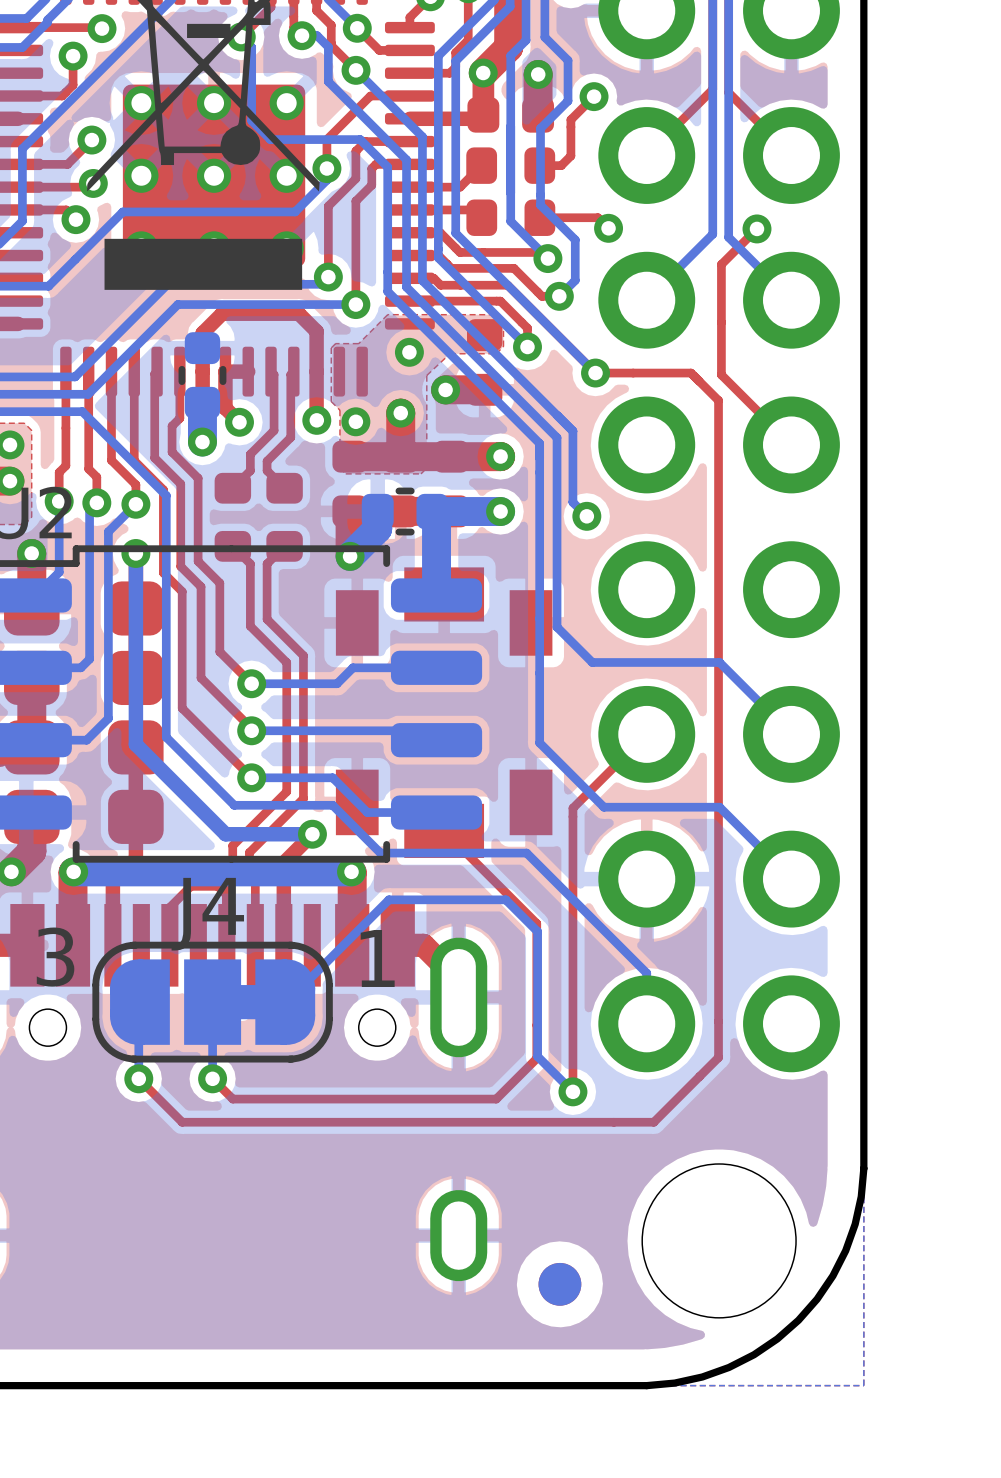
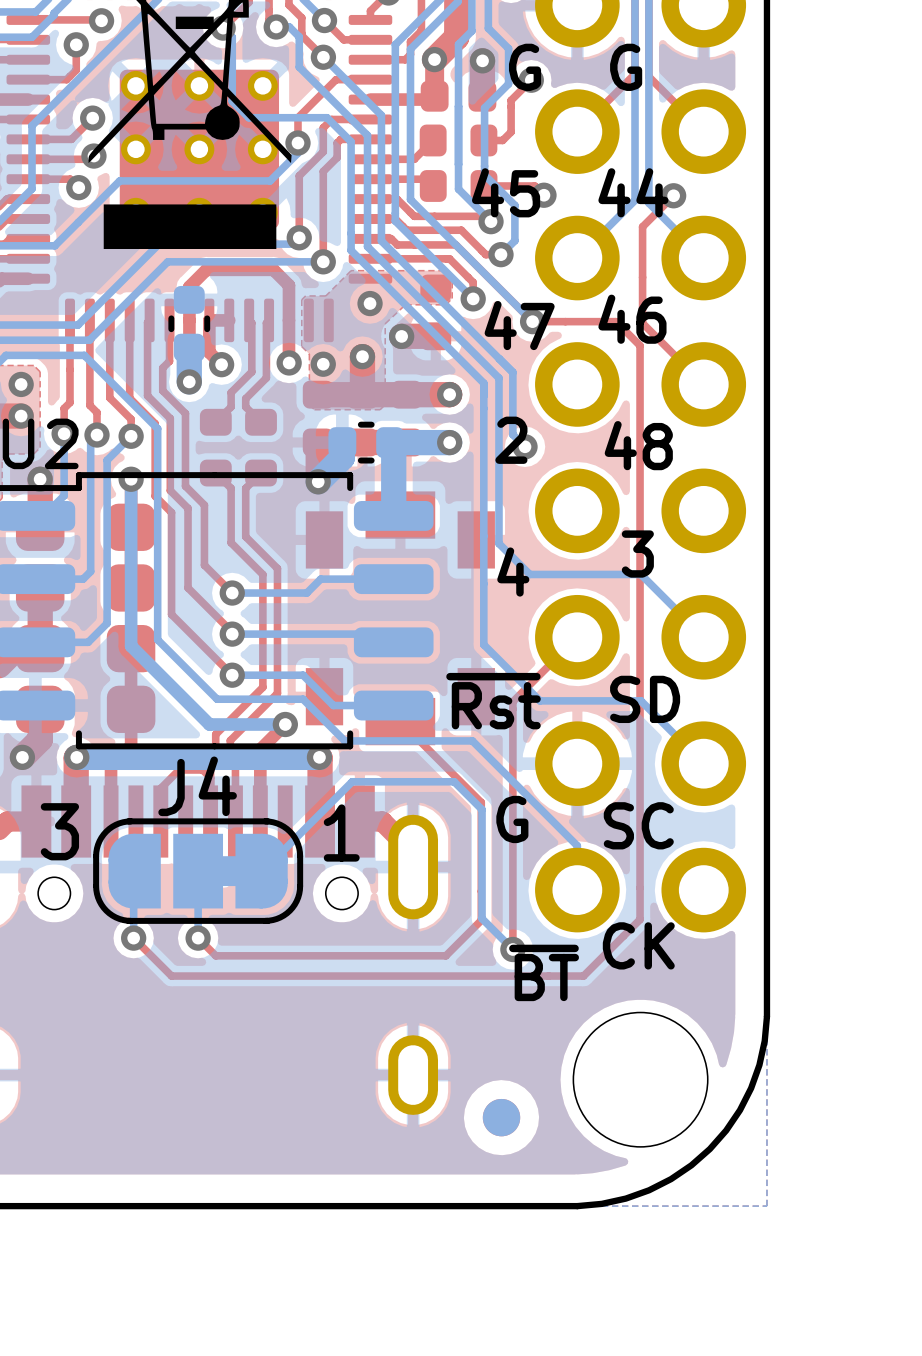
text: none -> G (525, 67)
text: none -> G (626, 67)
text: none -> 44 (633, 192)
text: none -> 45 (506, 192)
text: none -> 46 (632, 319)
text: none -> 47 (519, 325)
text: none -> 2 (511, 440)
text: none -> 48 (638, 445)
text: none -> 3 (637, 554)
text: none -> 4 (513, 572)
text: none -> SD (645, 699)
text: none -> ~{Rst} (493, 701)
text: none -> G (512, 819)
text: none -> SC (638, 825)
text: none -> CK (638, 945)
text: none -> ~{BT} (544, 972)

